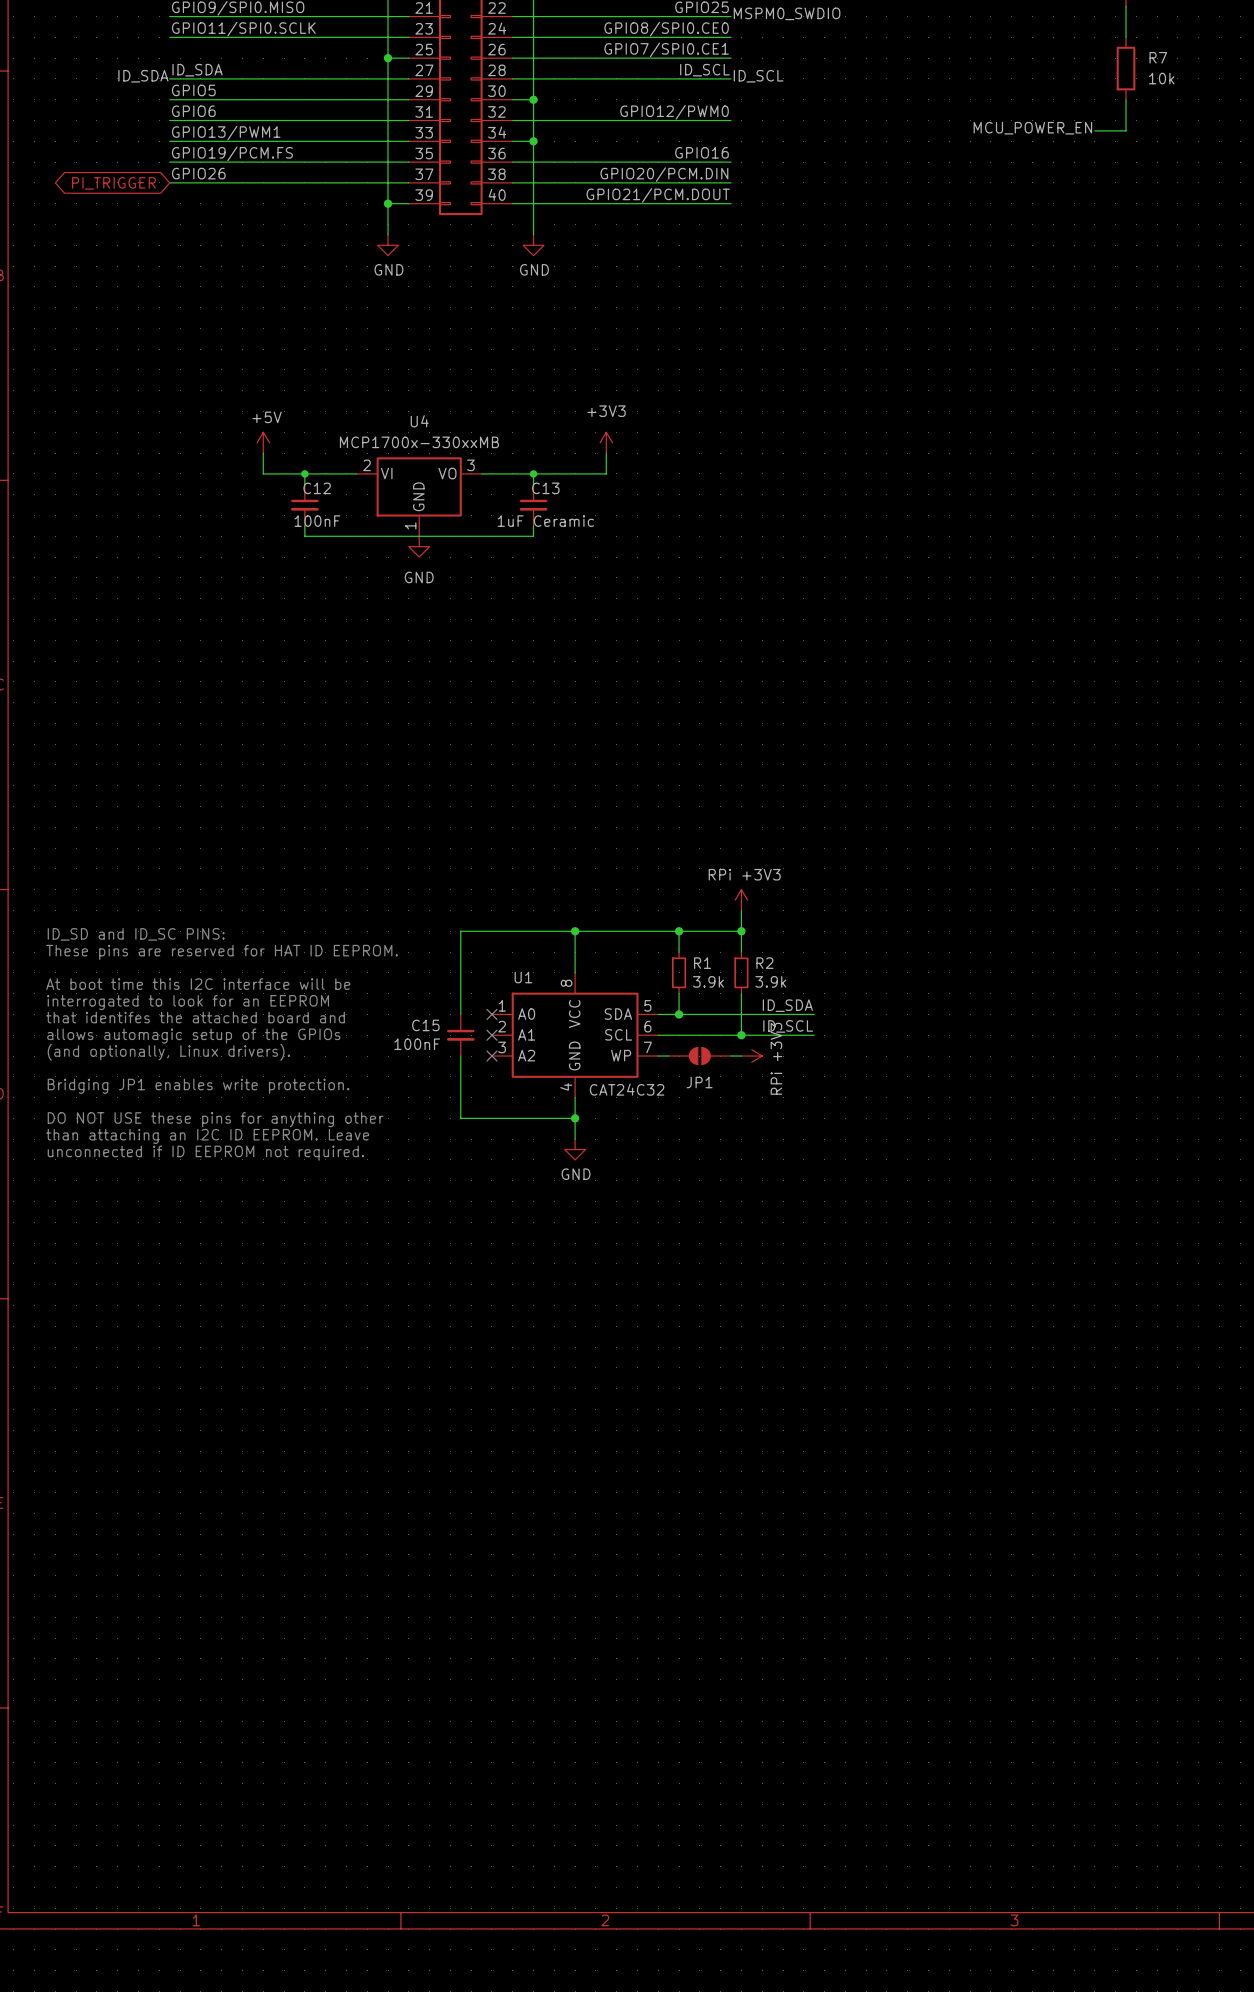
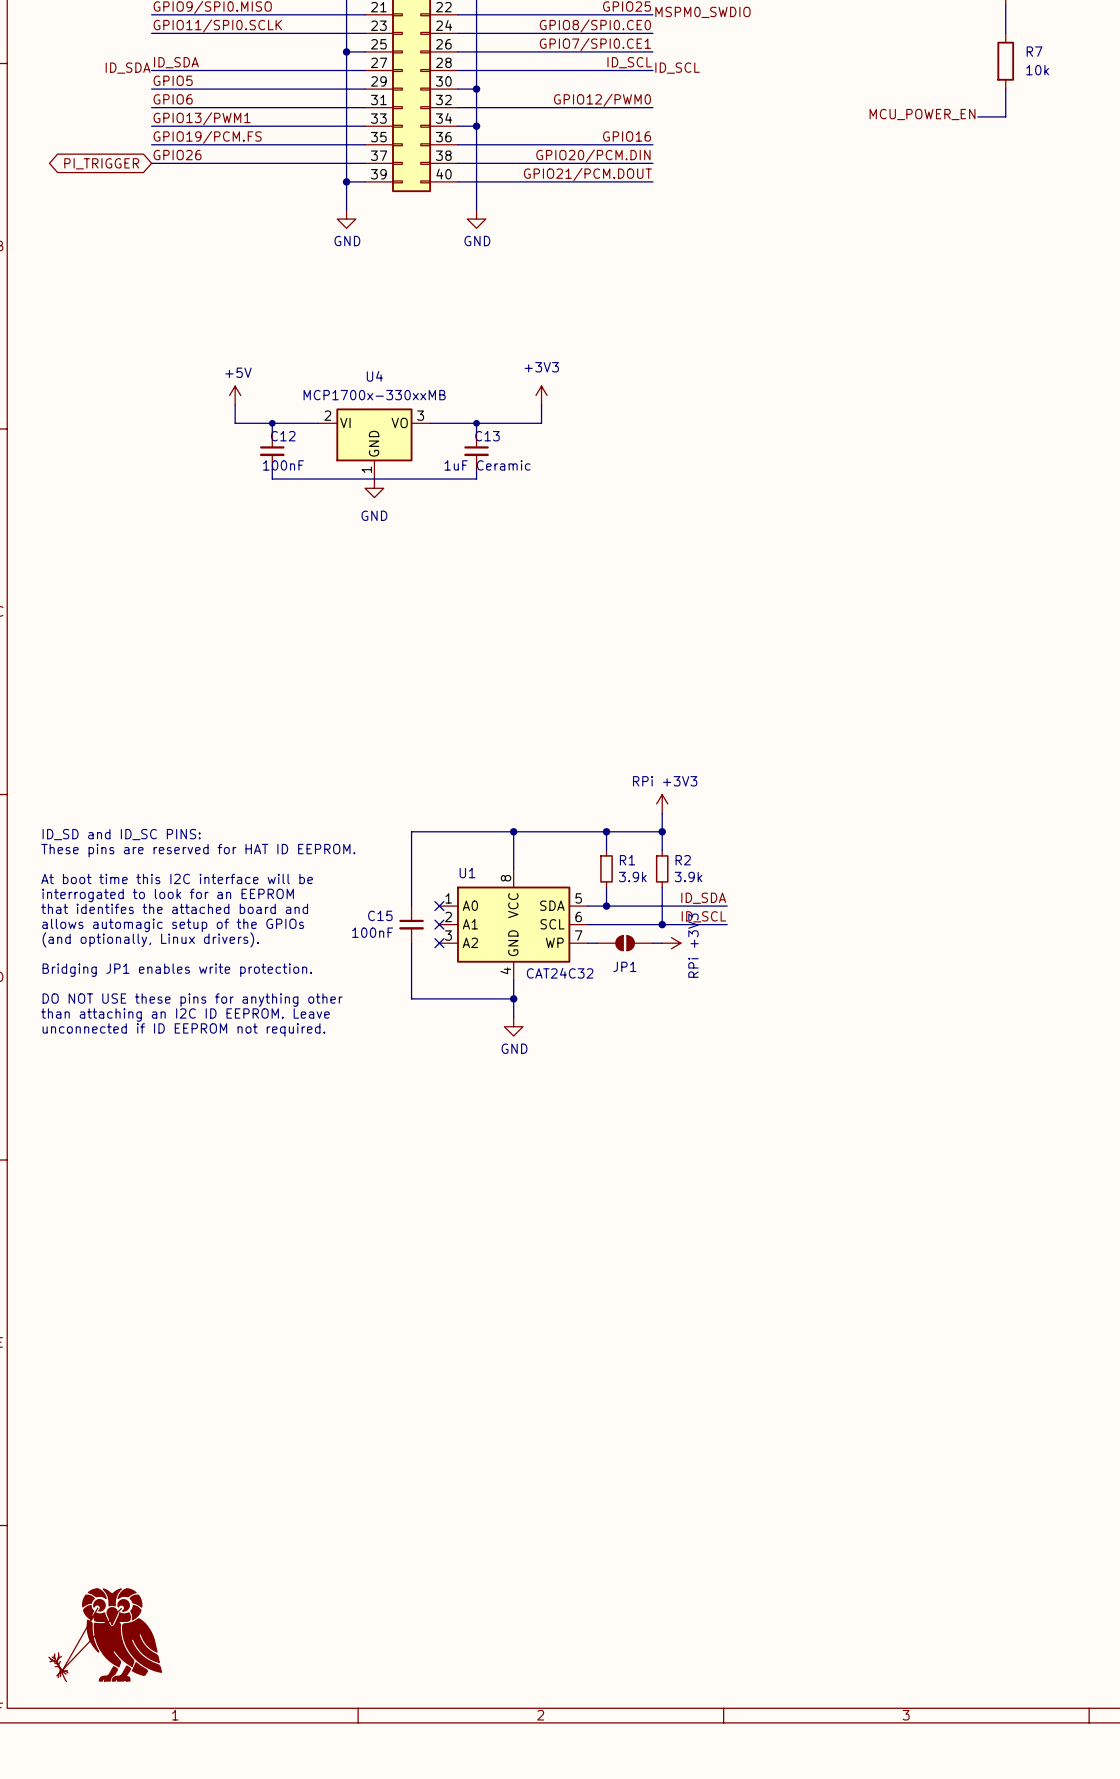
part: none -> (105, 1635)

